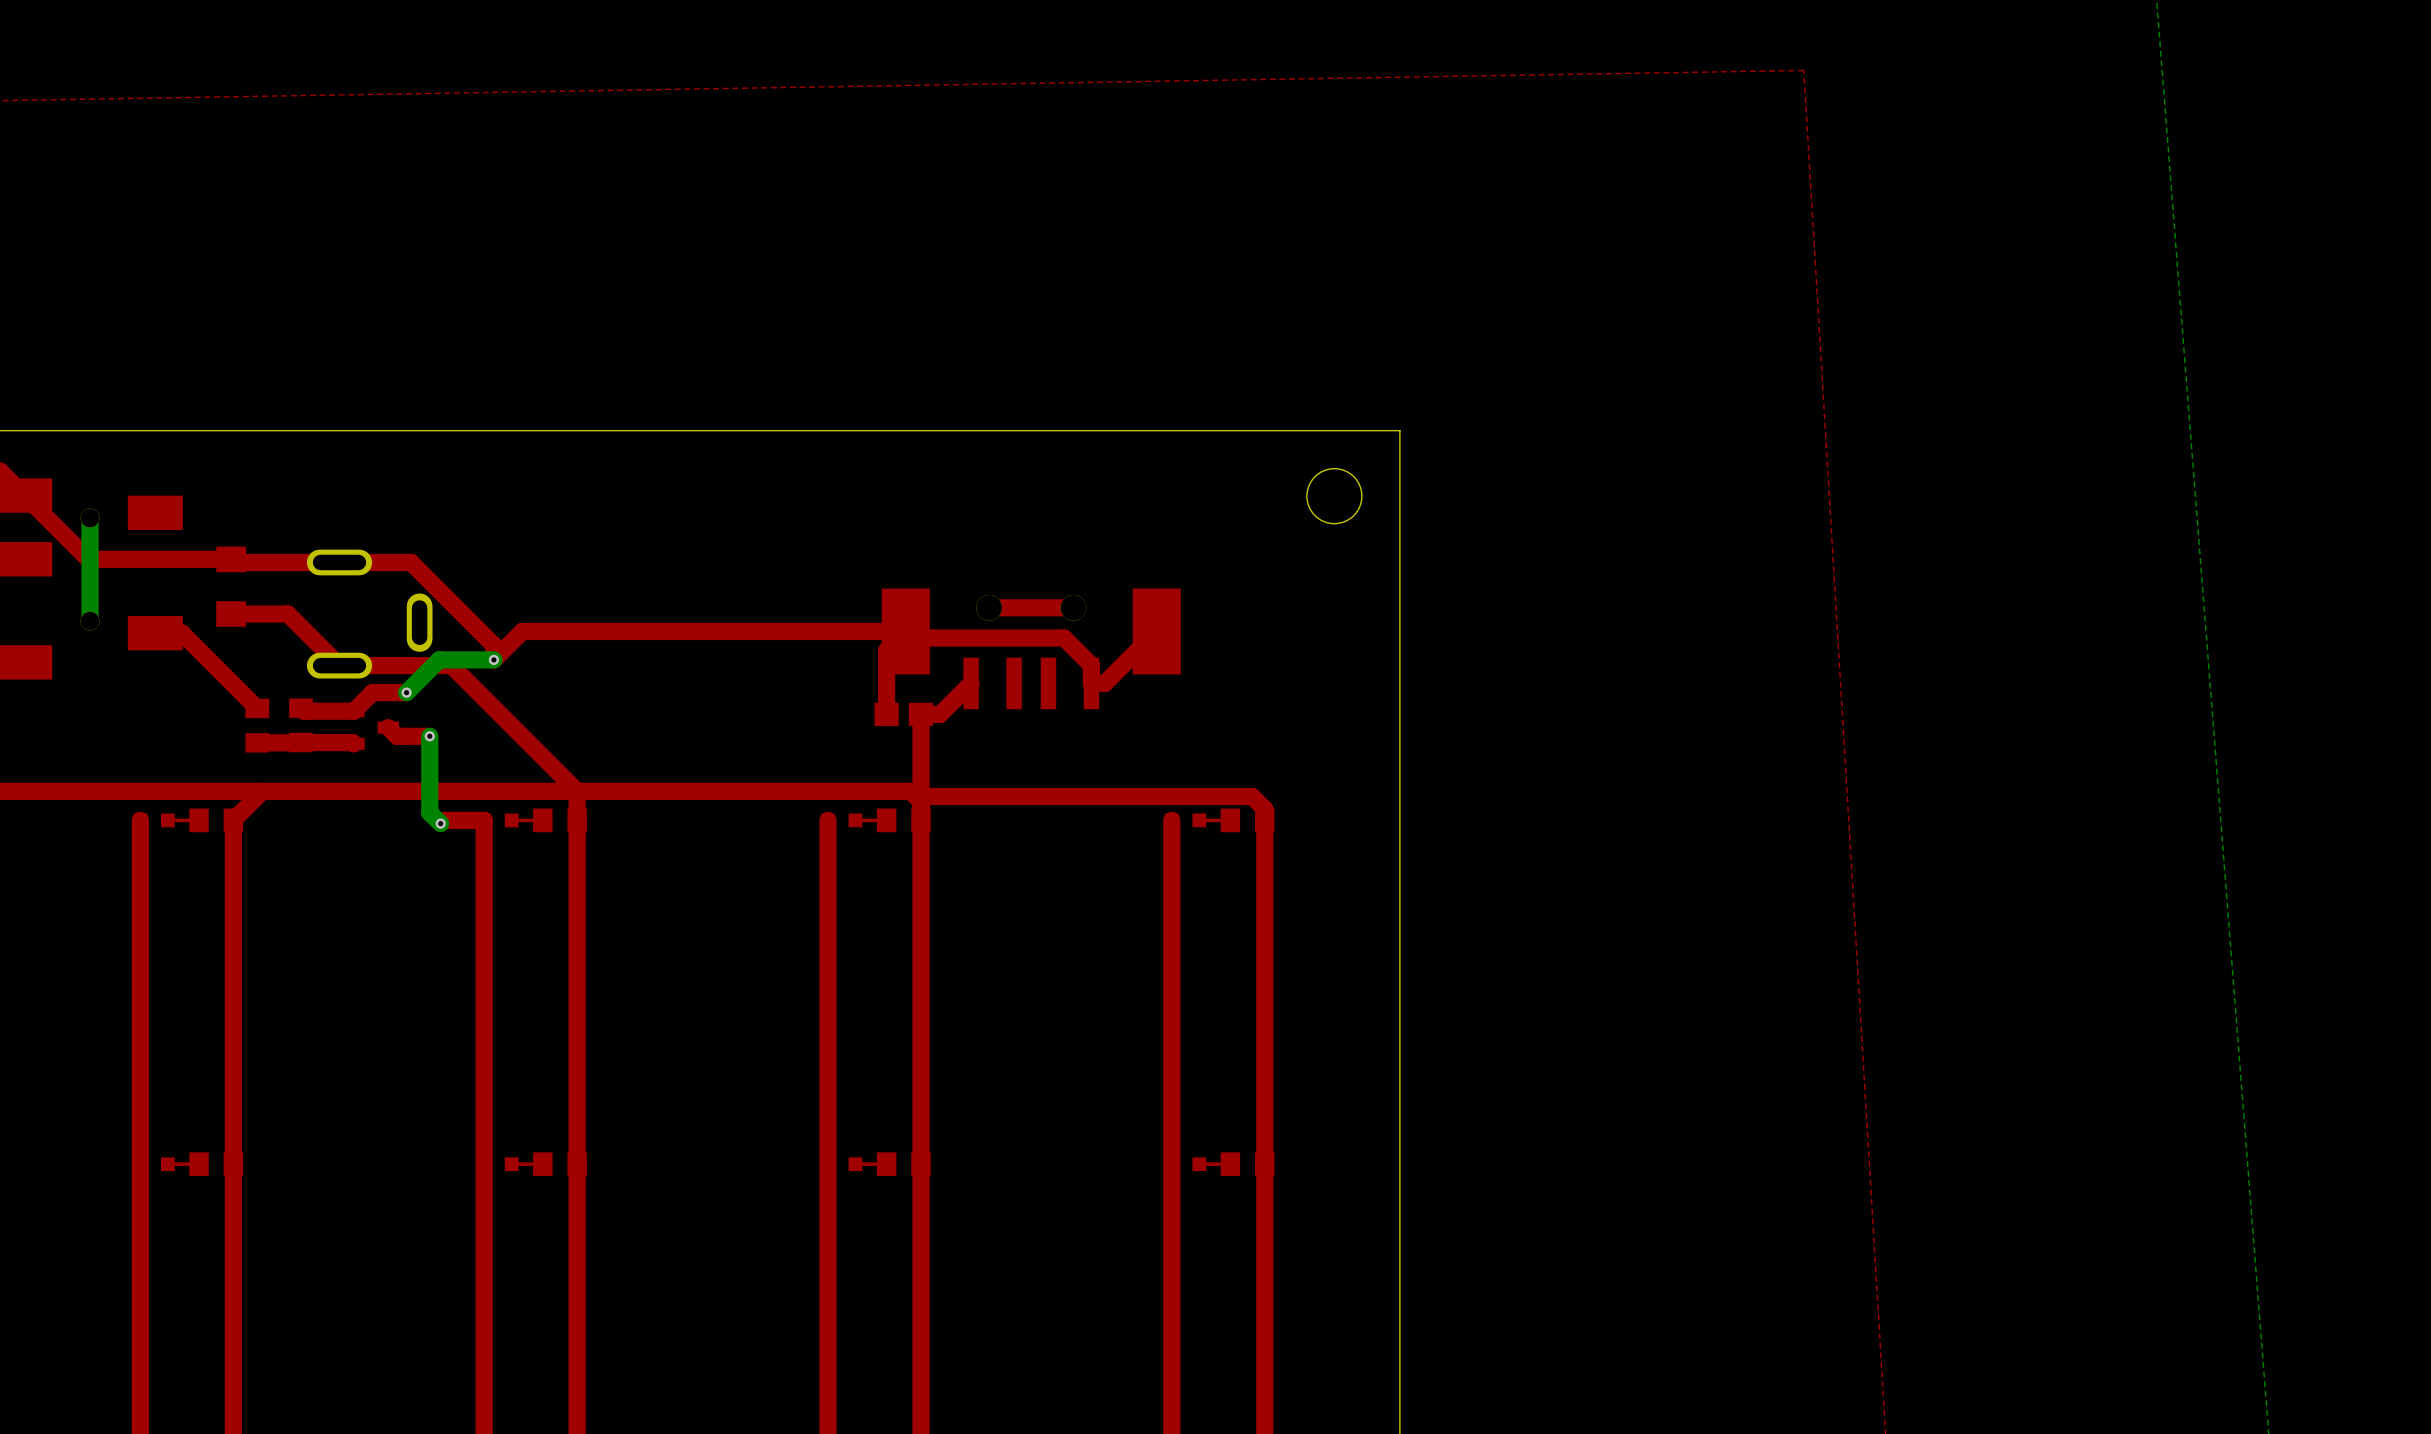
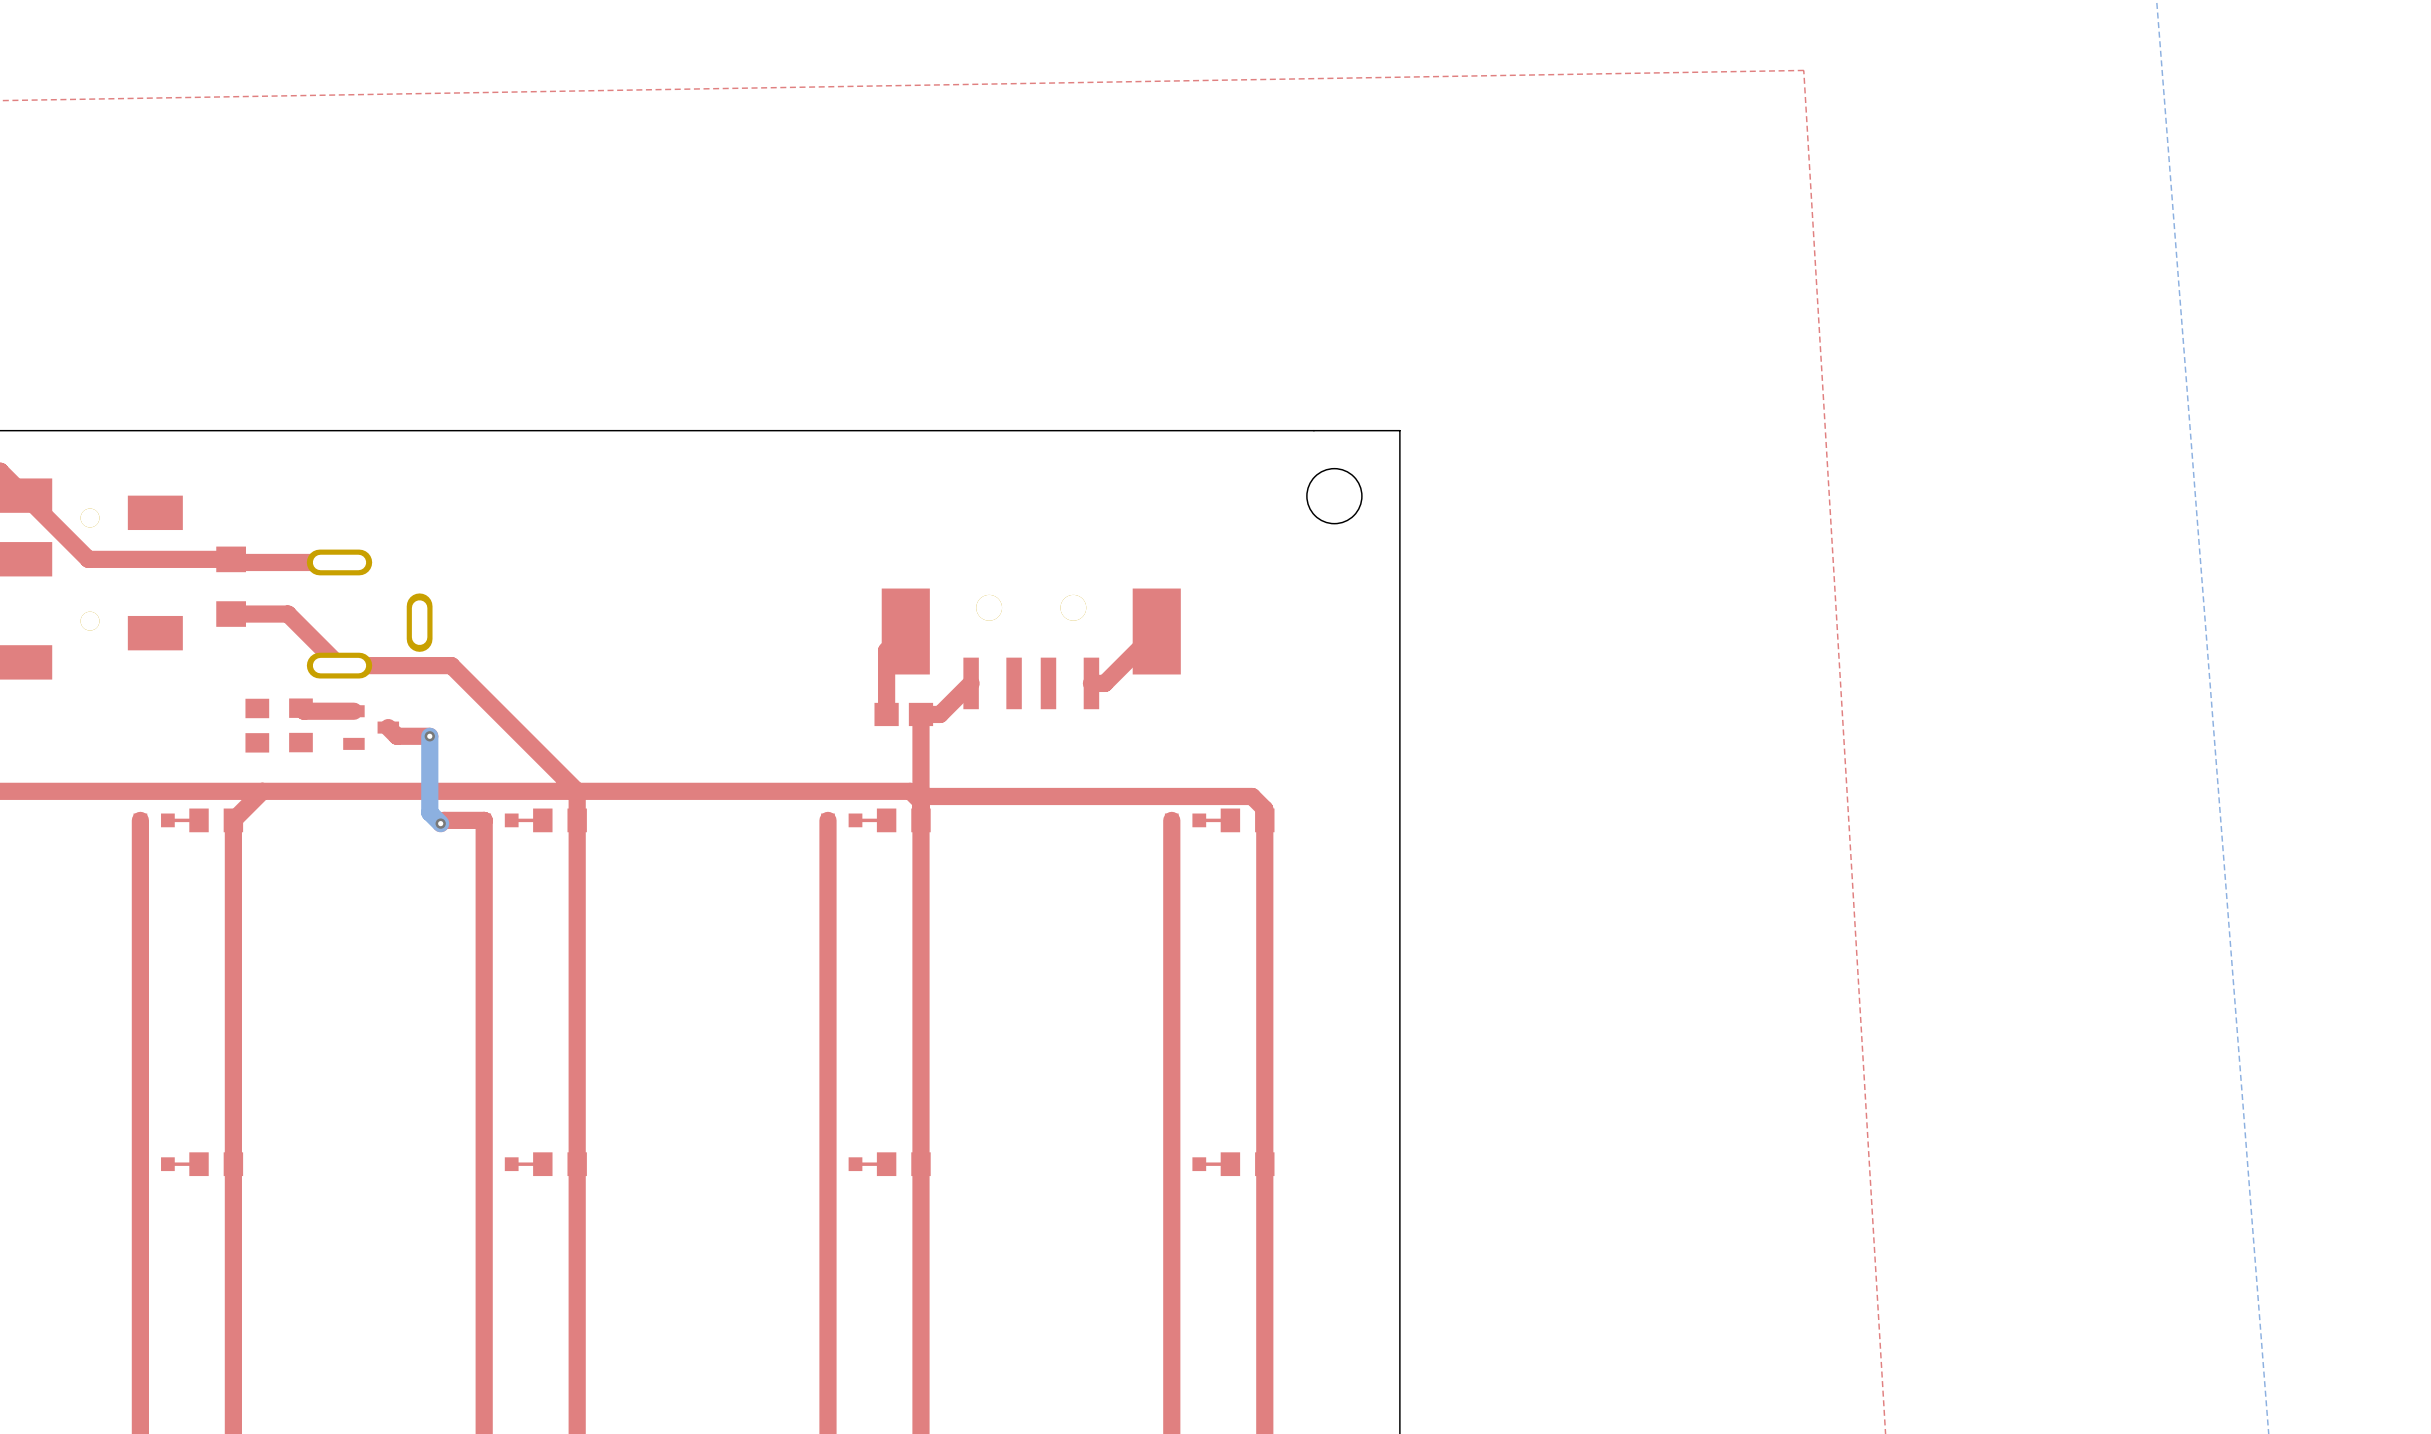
bottom track: (90, 517) (90, 621) -> none
top track: (339, 562) (411, 562) (493, 645) (493, 659) (522, 631) (905, 631) (912, 638) (1064, 638) (1091, 665) (1091, 683) -> none
top track: (1073, 607) (989, 607) -> none
top track: (155, 633) (182, 633) (257, 708) -> none
bottom track: (493, 659) (439, 659) (406, 692) -> none
via: (493, 659) -> none
top track: (406, 692) (372, 692) (353, 711) -> none
via: (406, 692) -> none
top track: (257, 742) (353, 743) -> none

